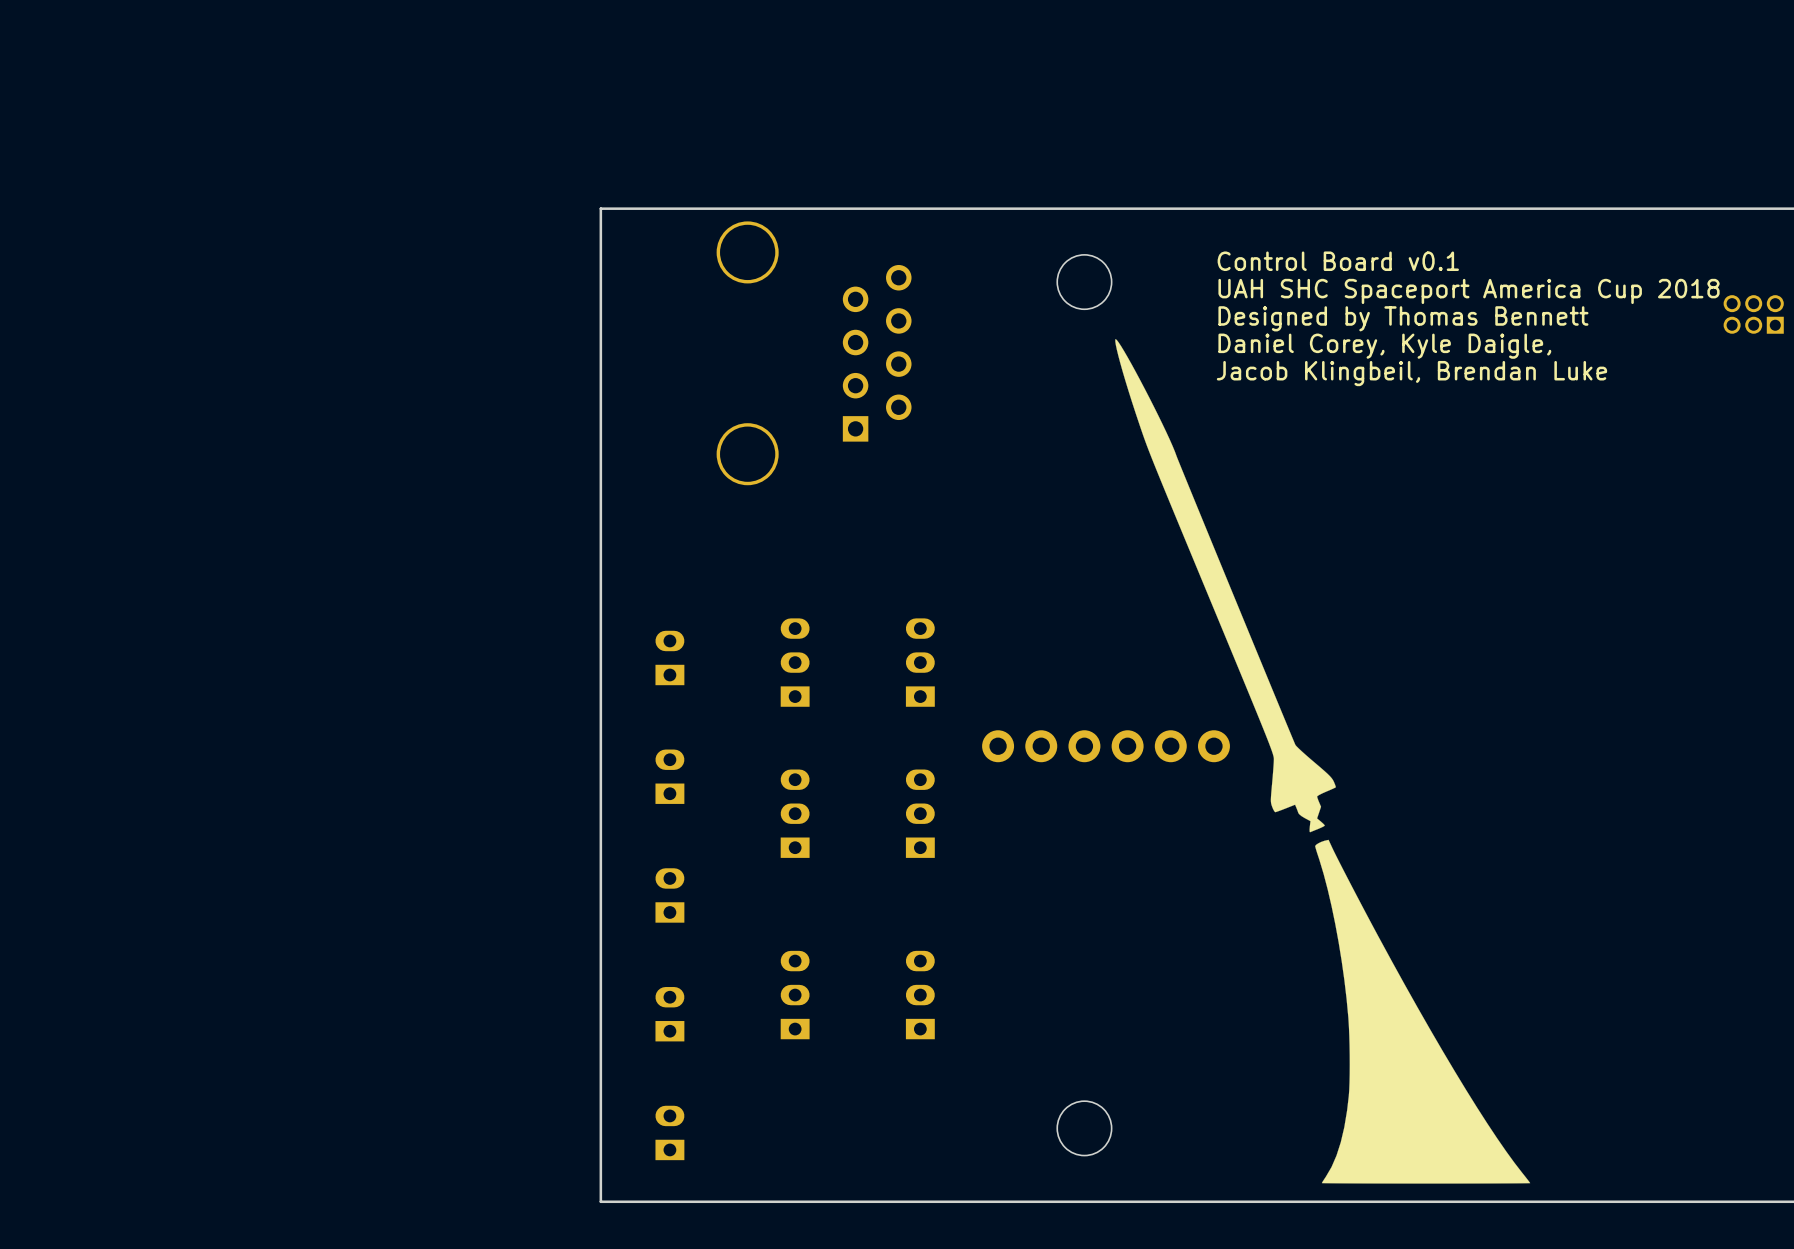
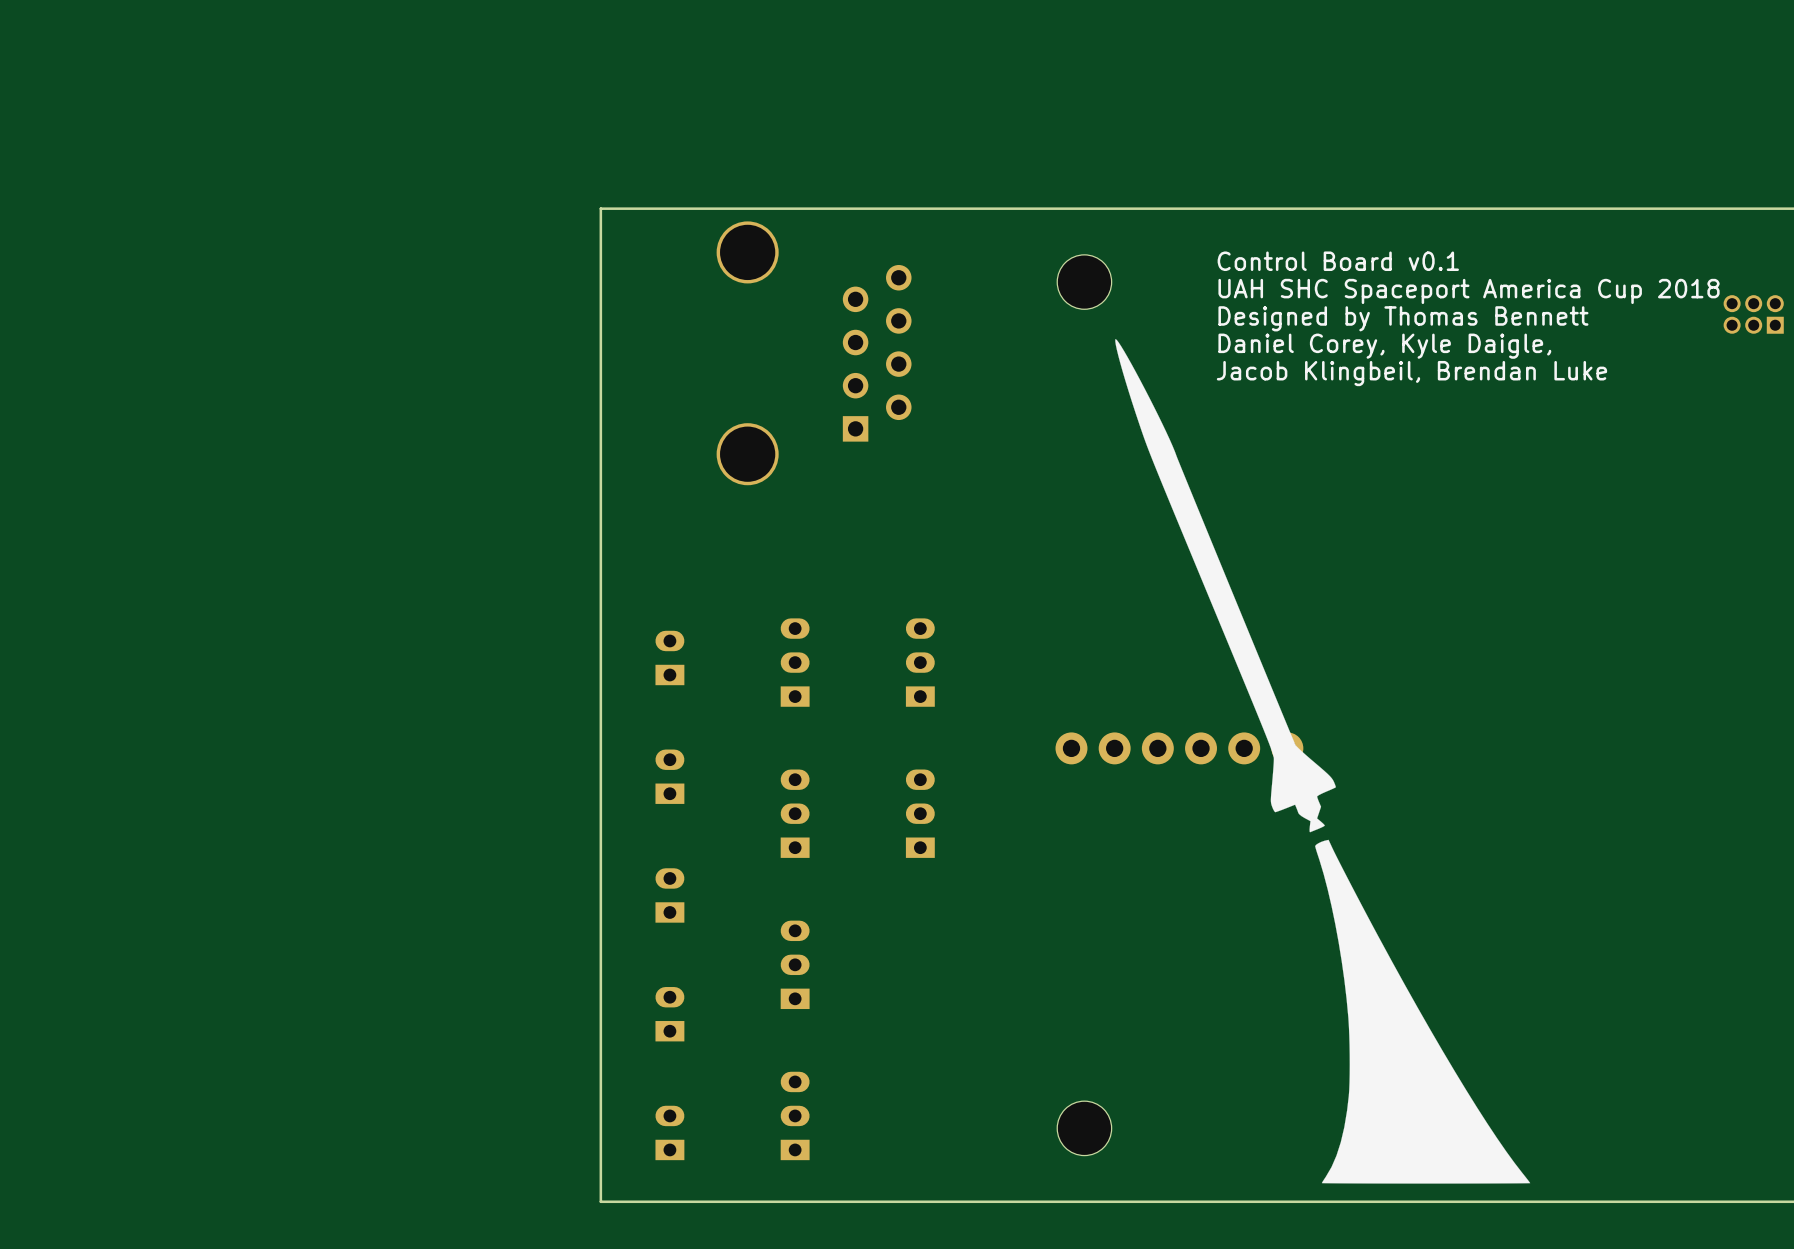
part position: (1106, 746) -> (1179, 748)
part position: (795, 995) -> (795, 964)
part: (920, 995) -> none
part: none -> (795, 1115)

